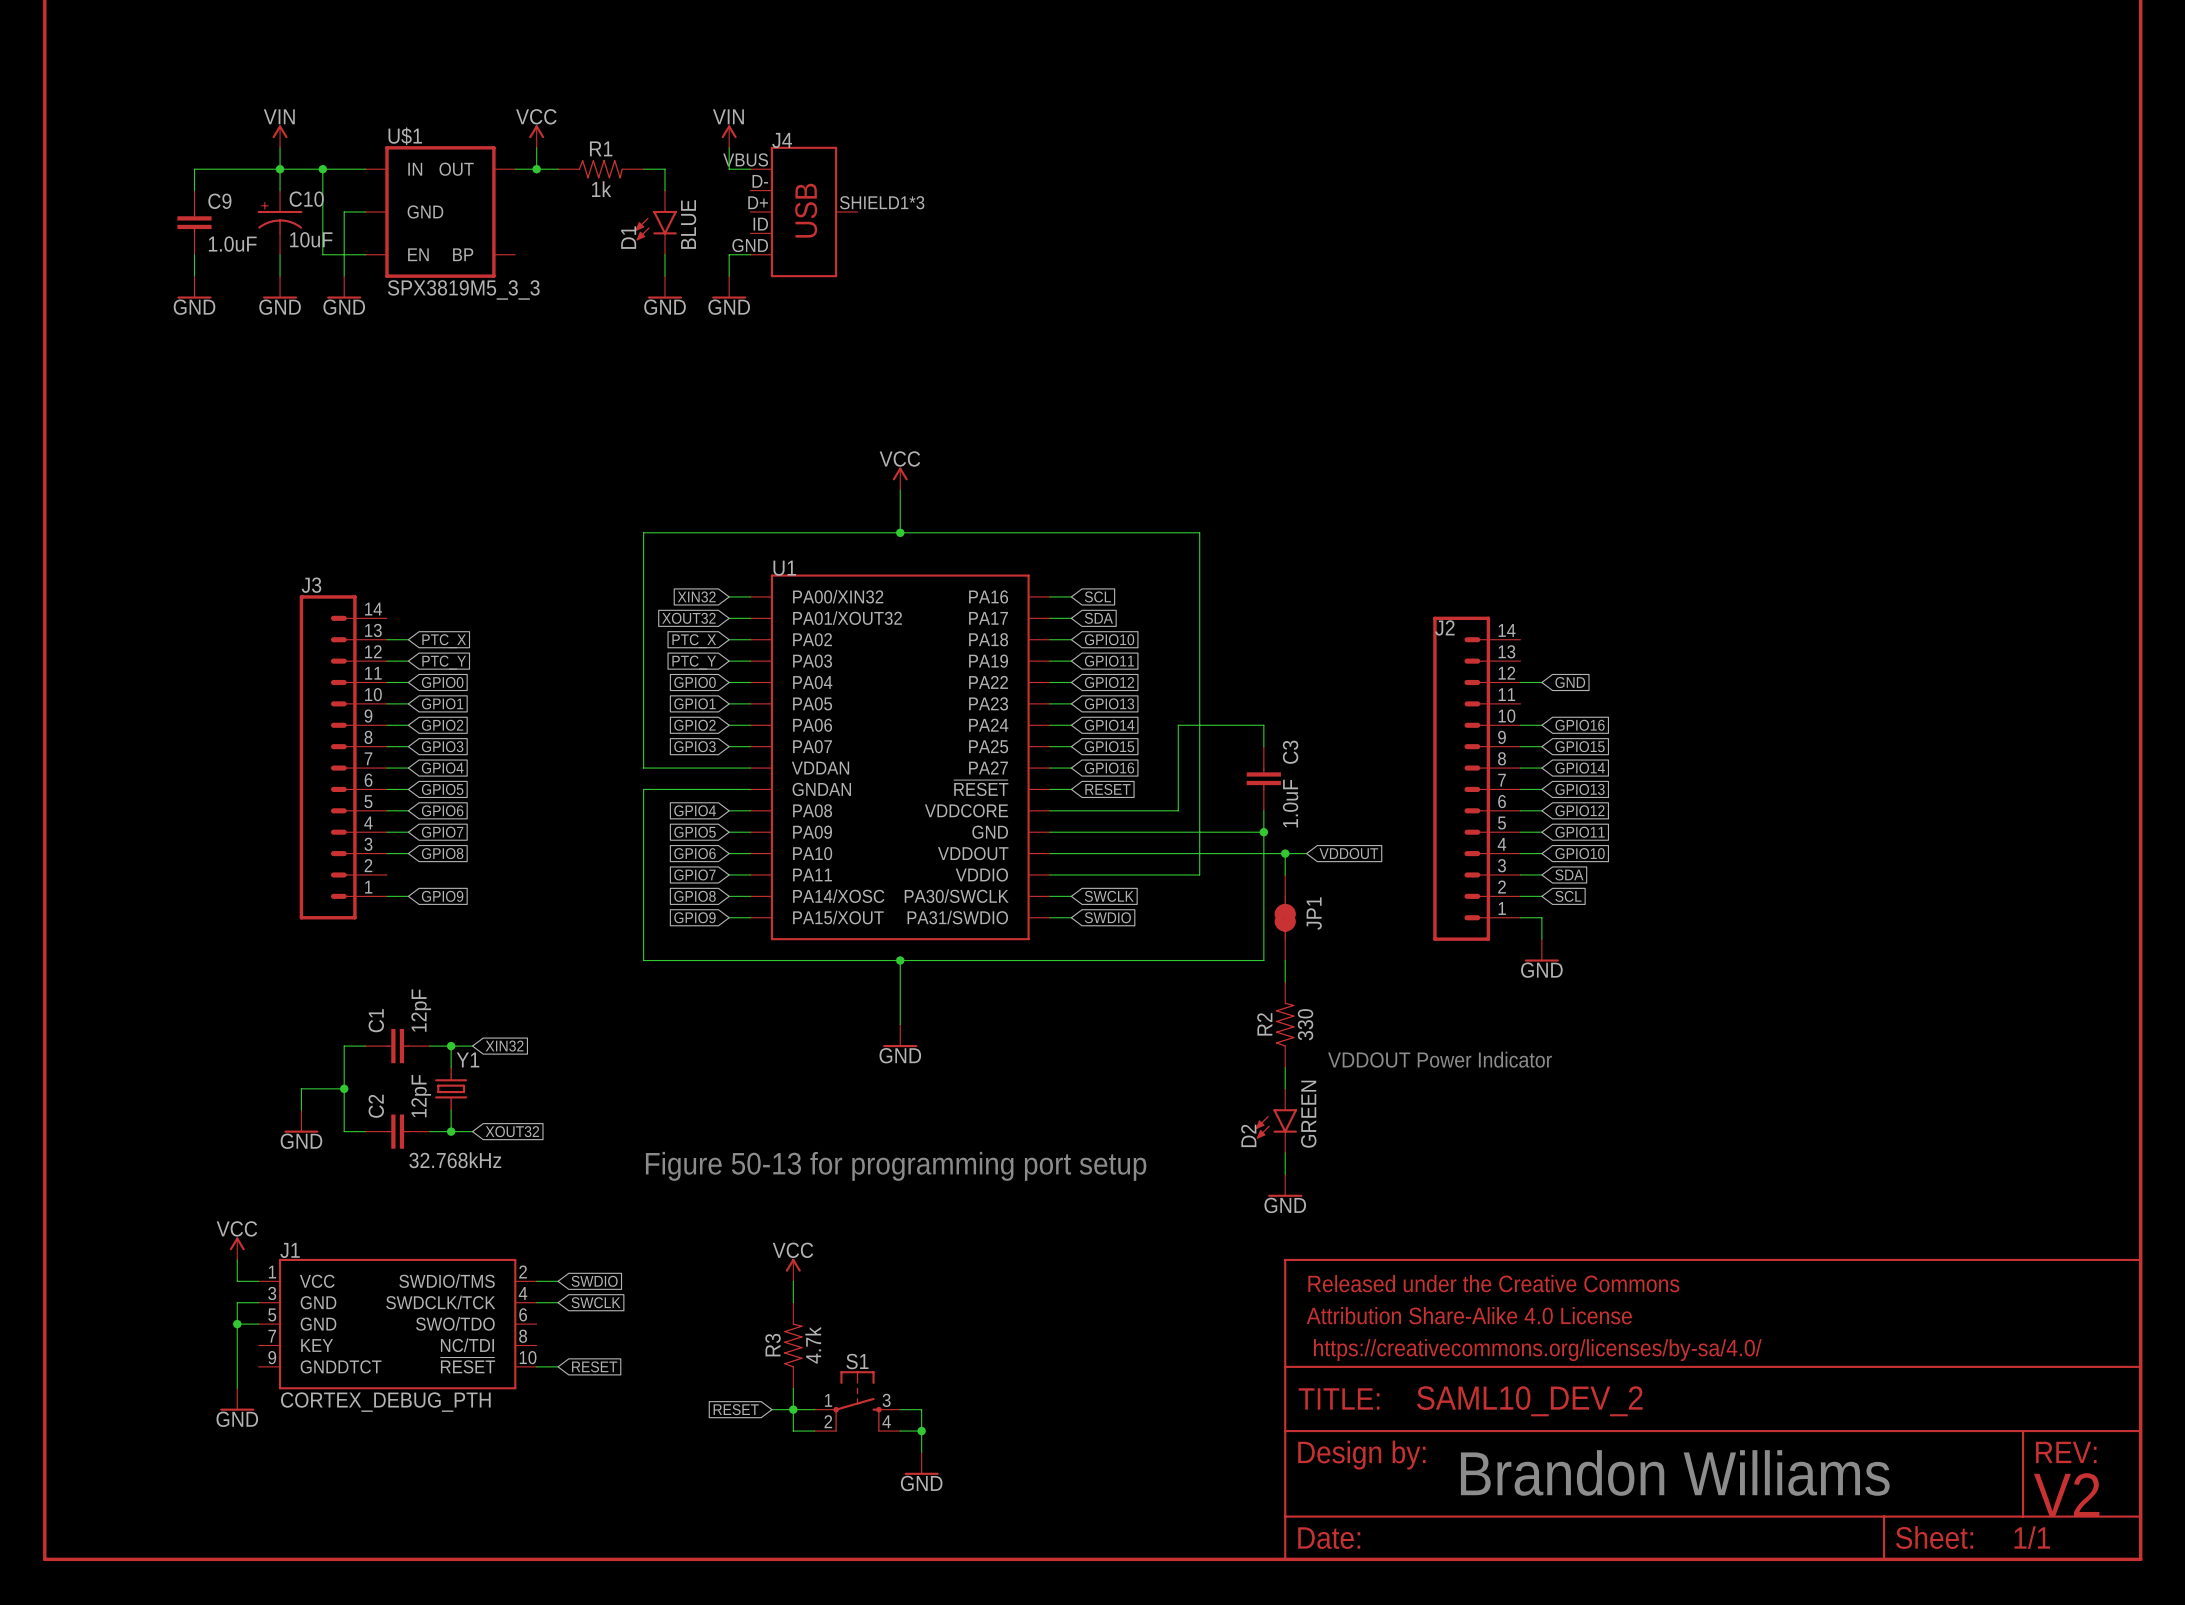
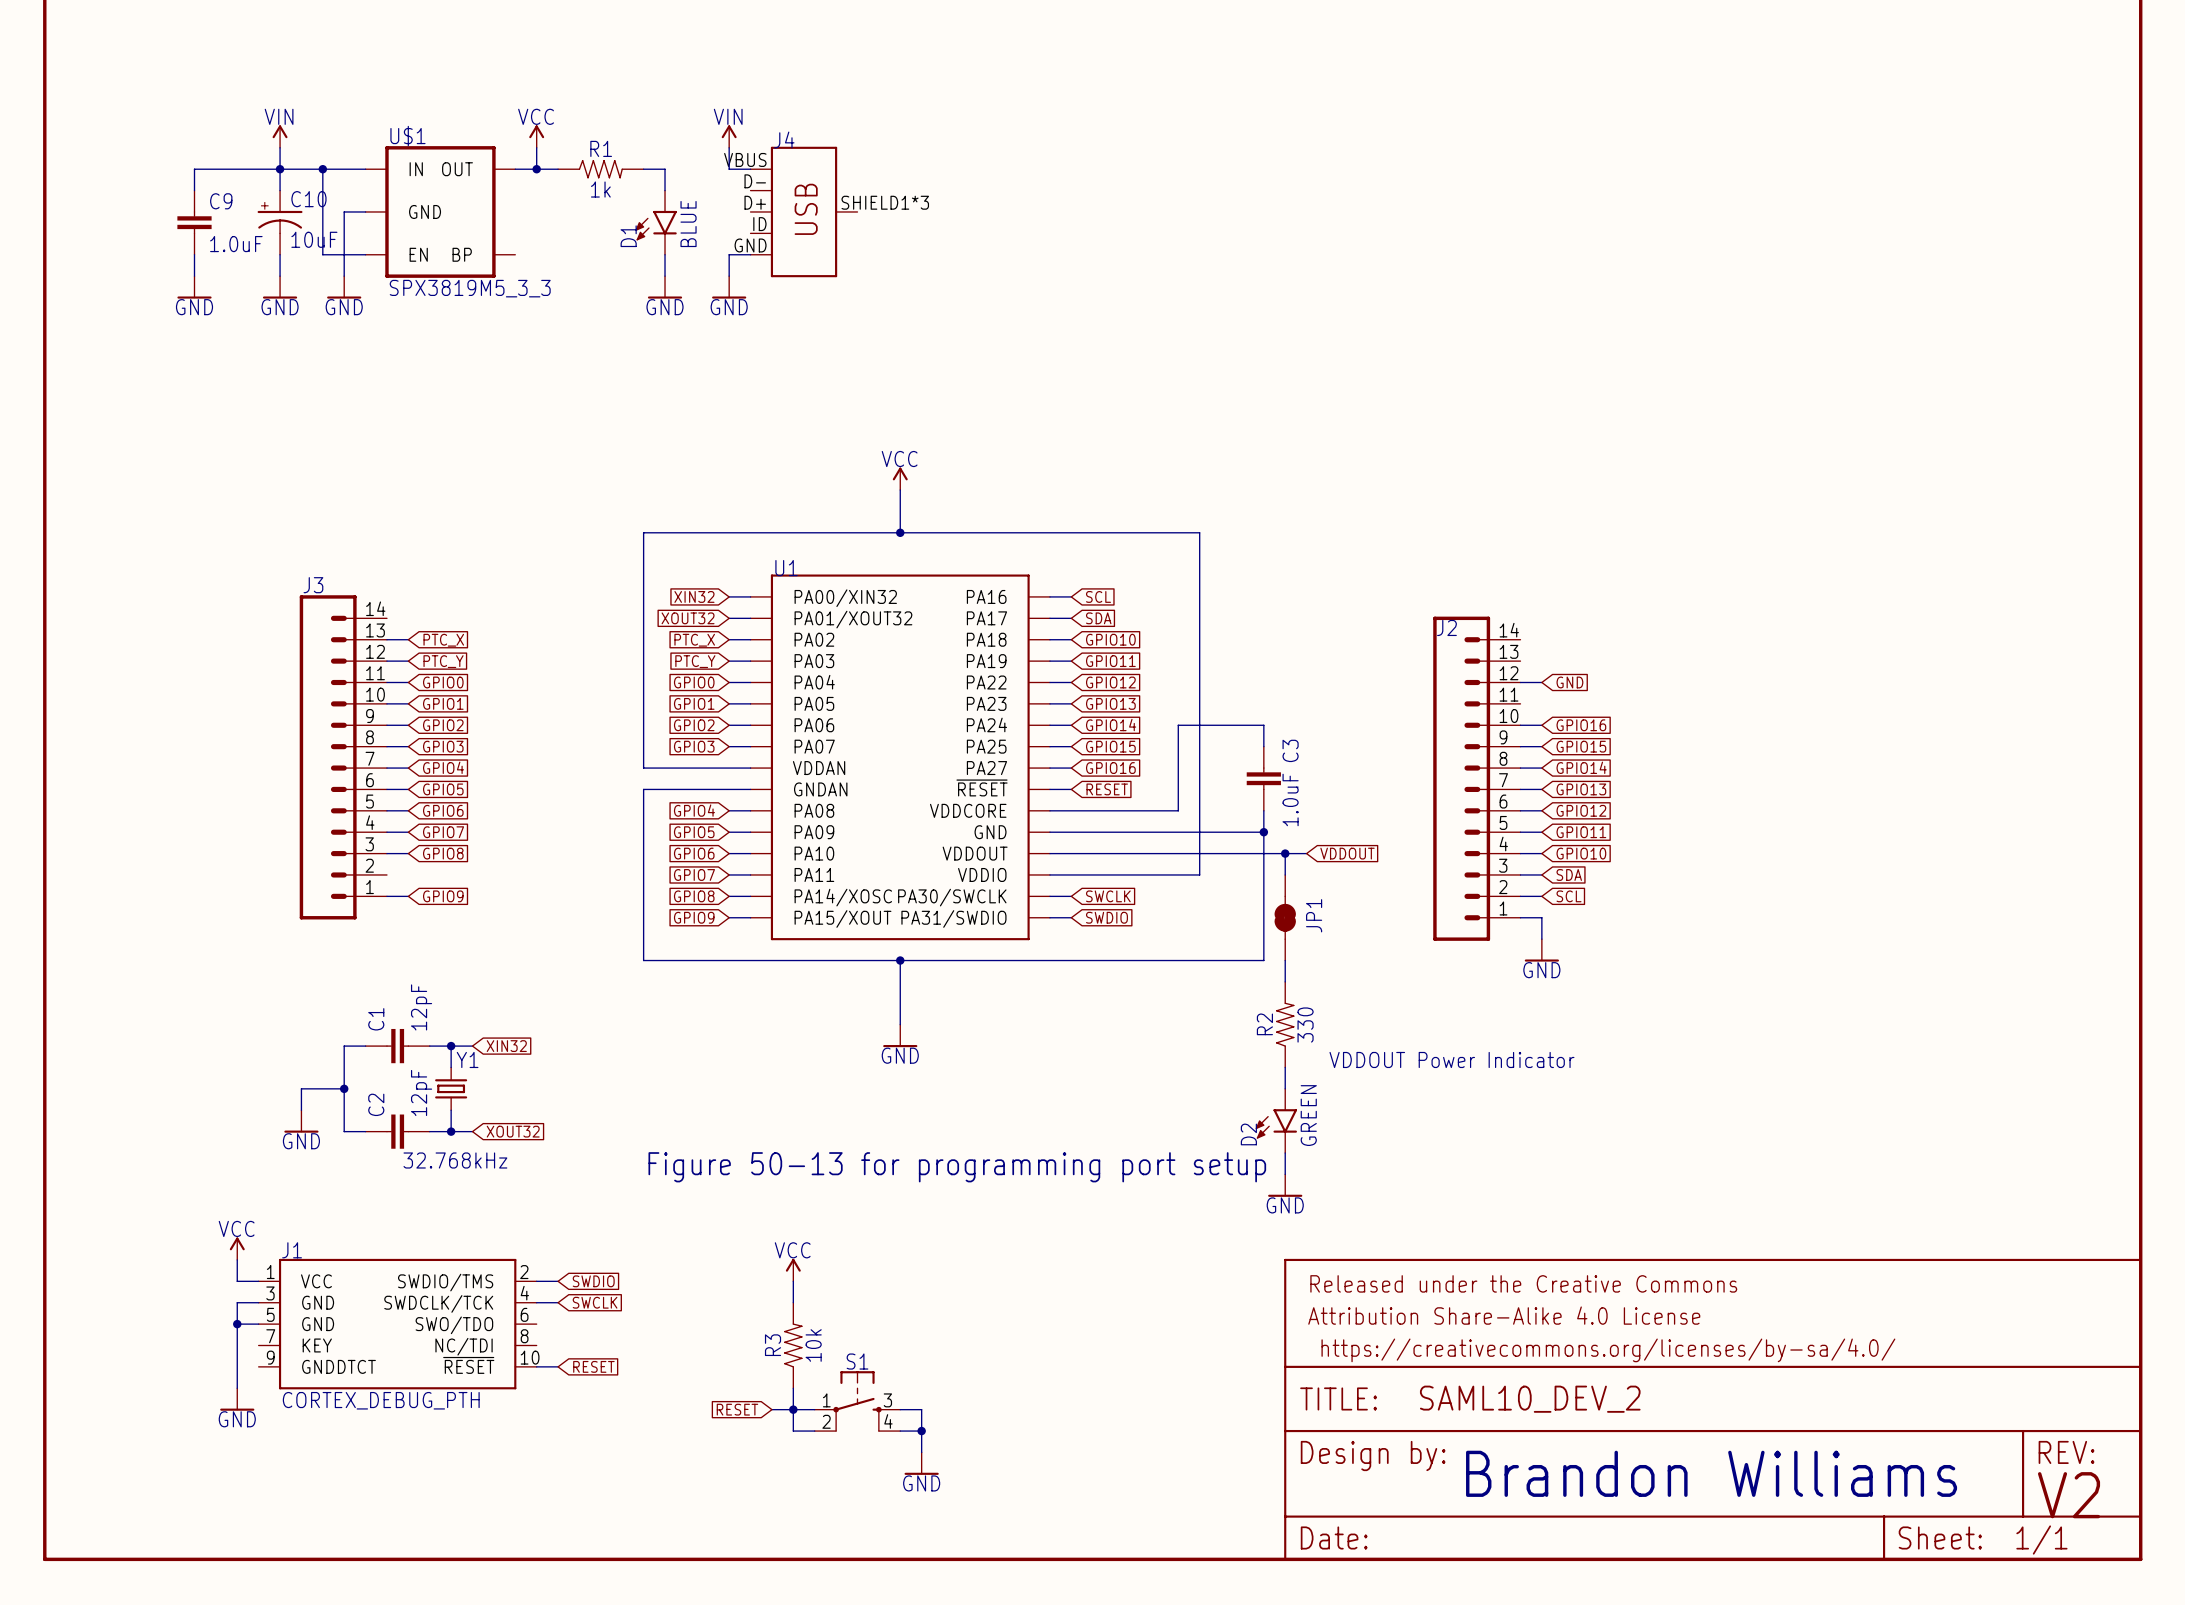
R3 value: 4.7k (813, 1345) -> 10k (813, 1345)

